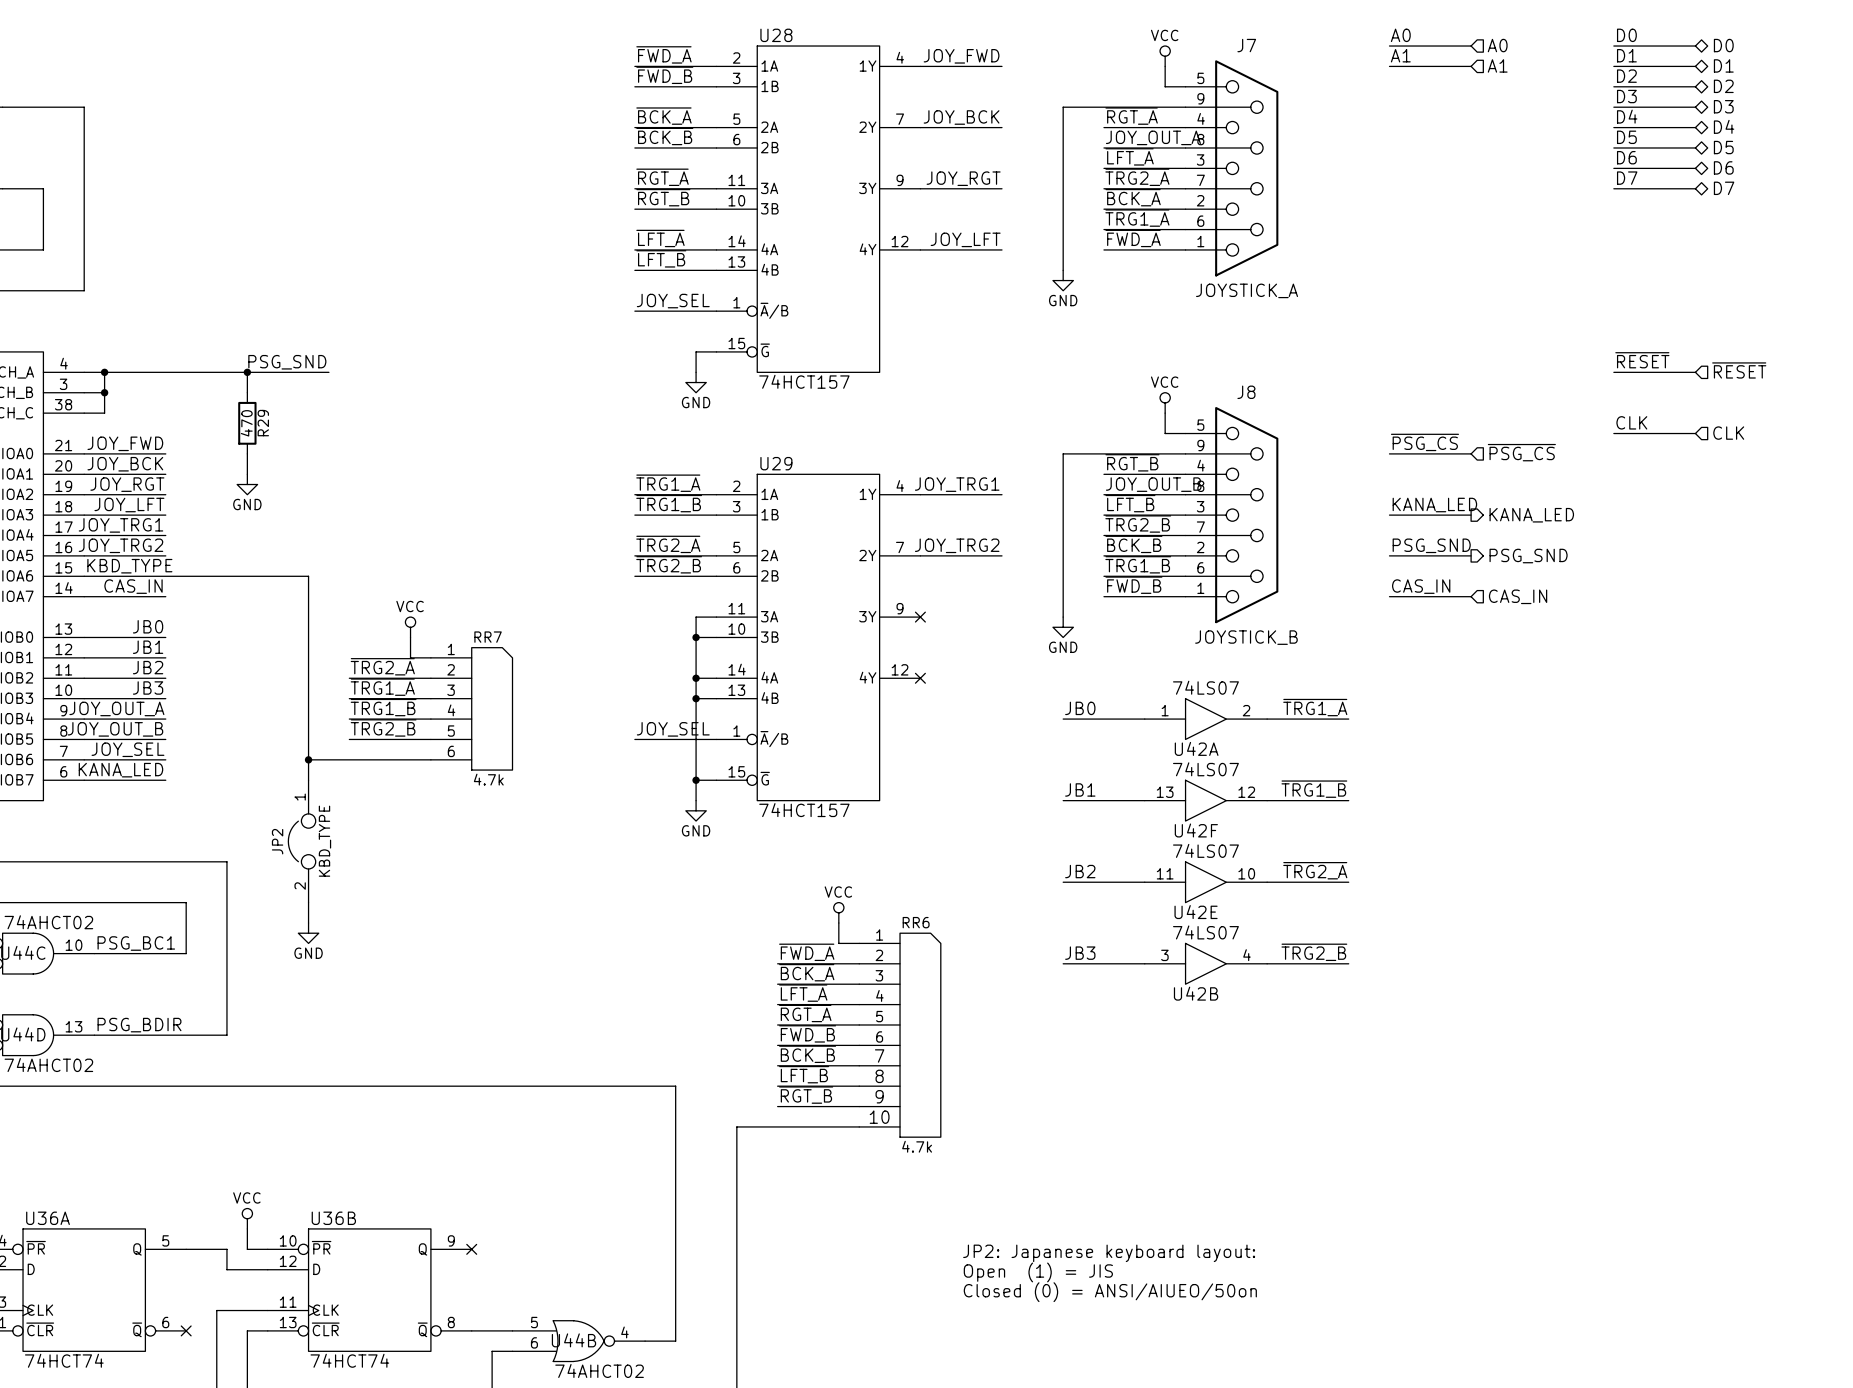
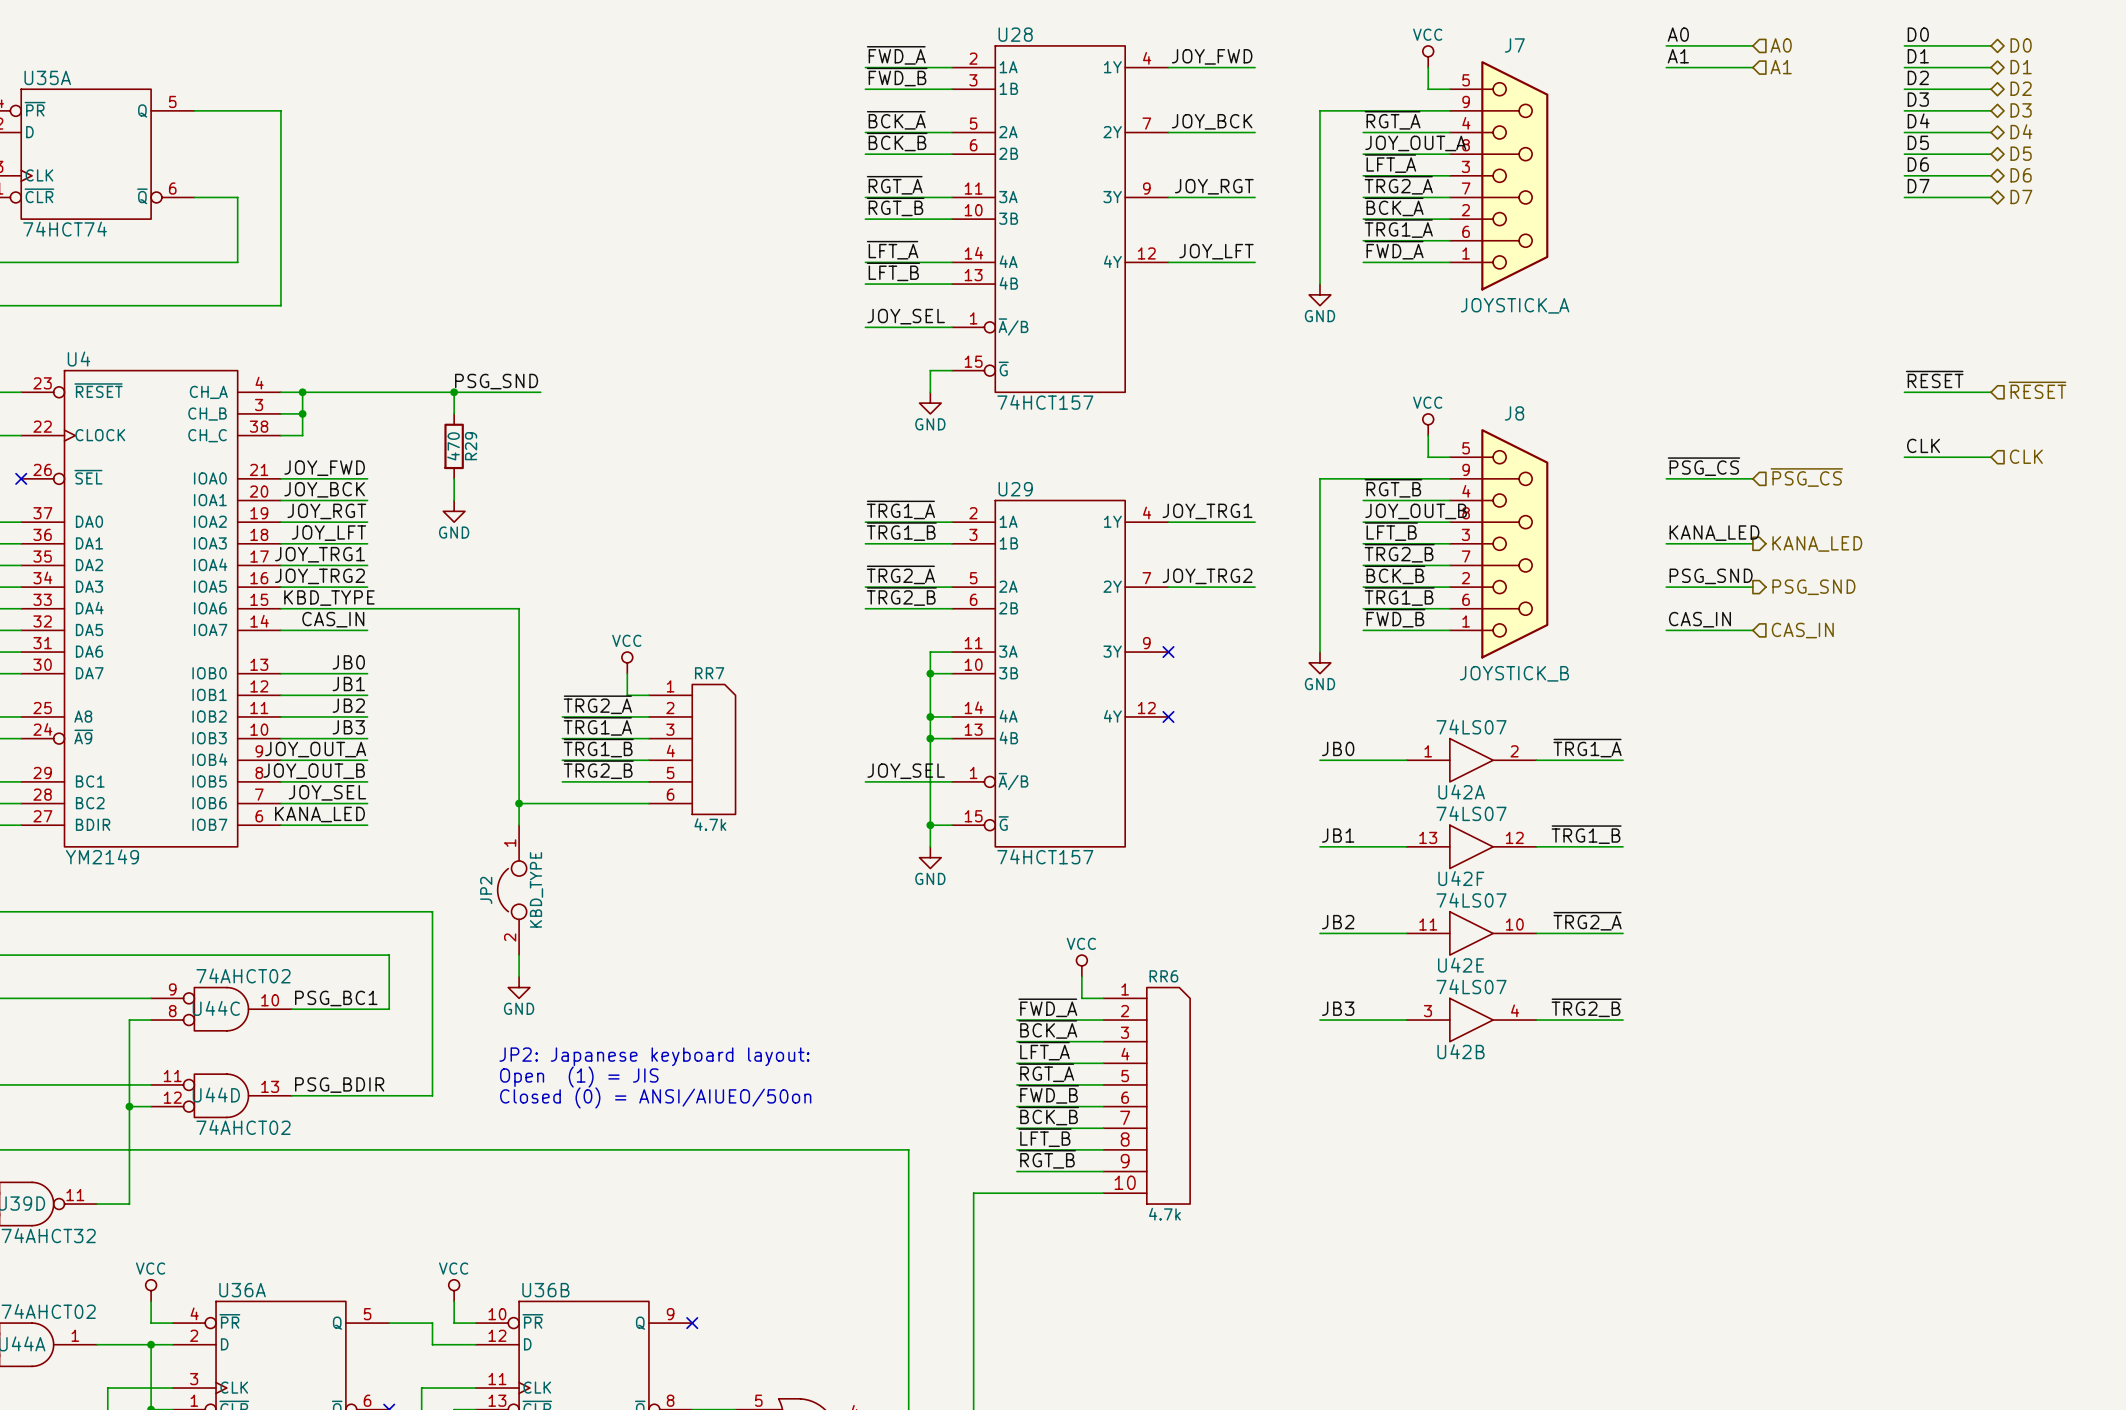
text: none -> JP2: Japanese keyboard layout: (654, 1056)
text: none -> Open (1) = JIS (579, 1077)
text: none -> Closed (0) = ANSI/AIUEO/50on (655, 1097)
text: JP2: Japanese keyboard layout: (1109, 1253) -> none
text: Open (1) = JIS (1038, 1272) -> none
text: Closed (0) = ANSI/AIUEO/50on (1110, 1292) -> none

